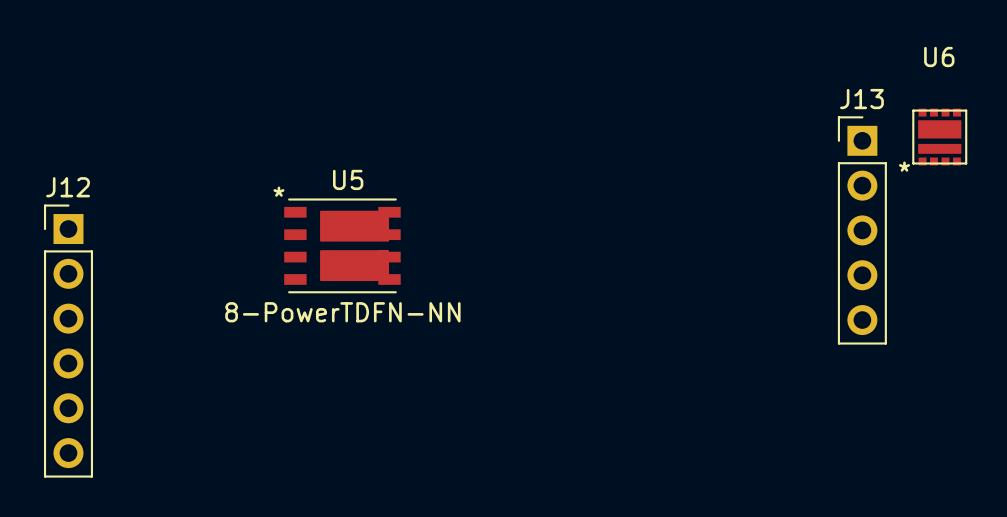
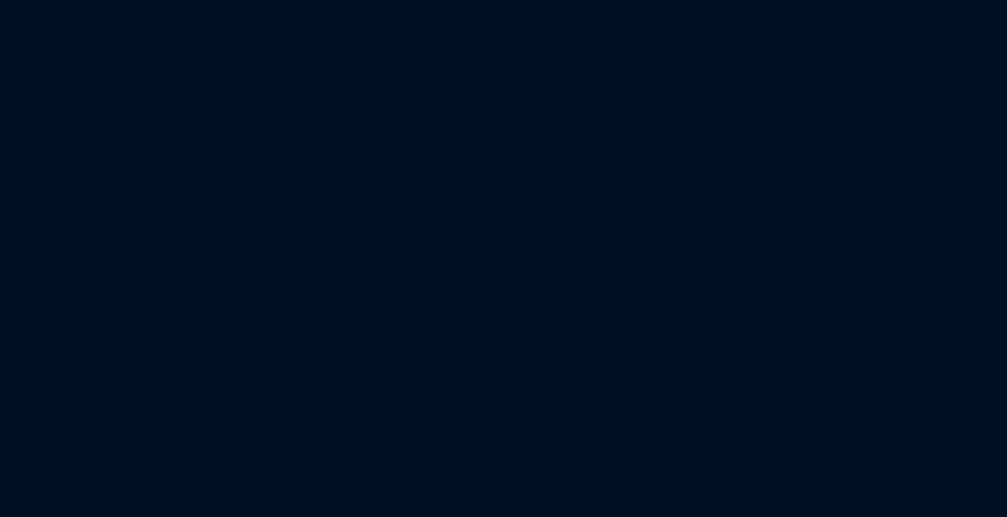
U6: (939, 137) -> none
J13: (862, 230) -> none
U5: 8-PowerTDFN-NN (342, 245) -> none
J12: (68, 341) -> none

